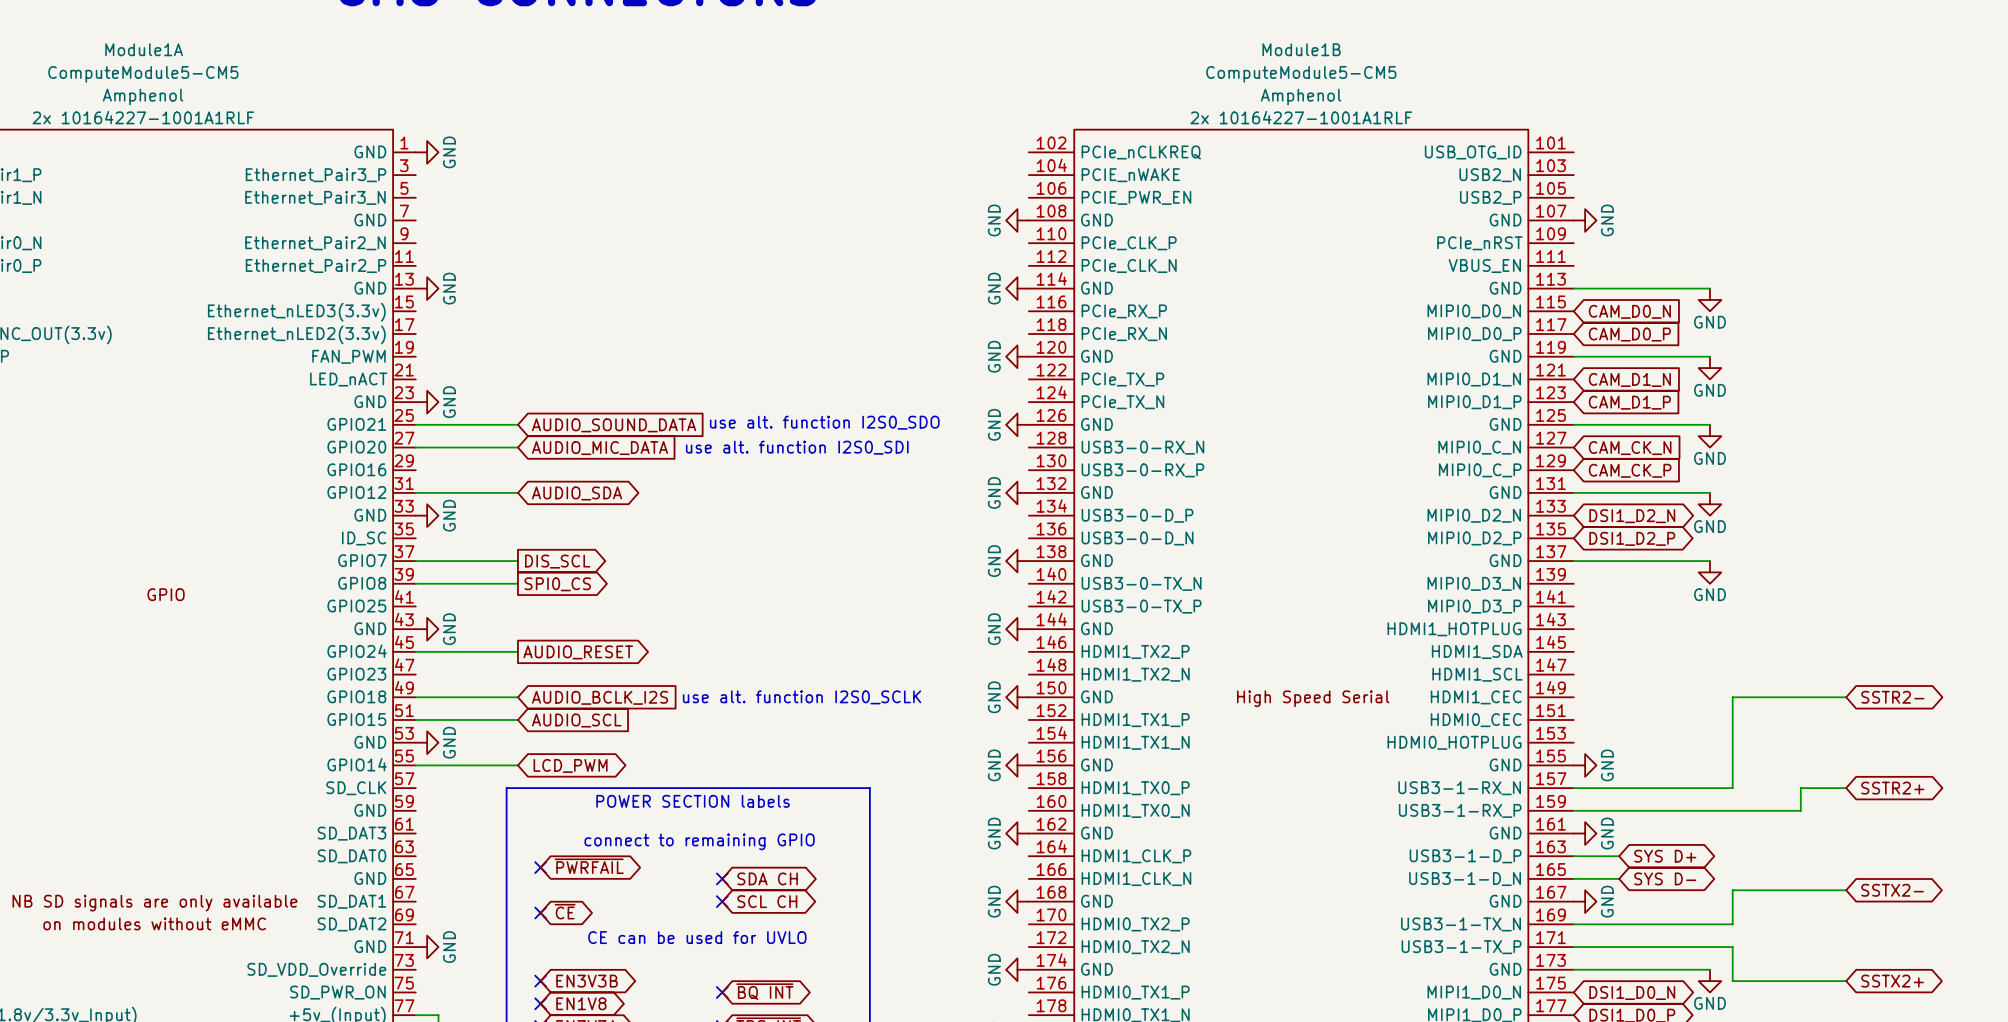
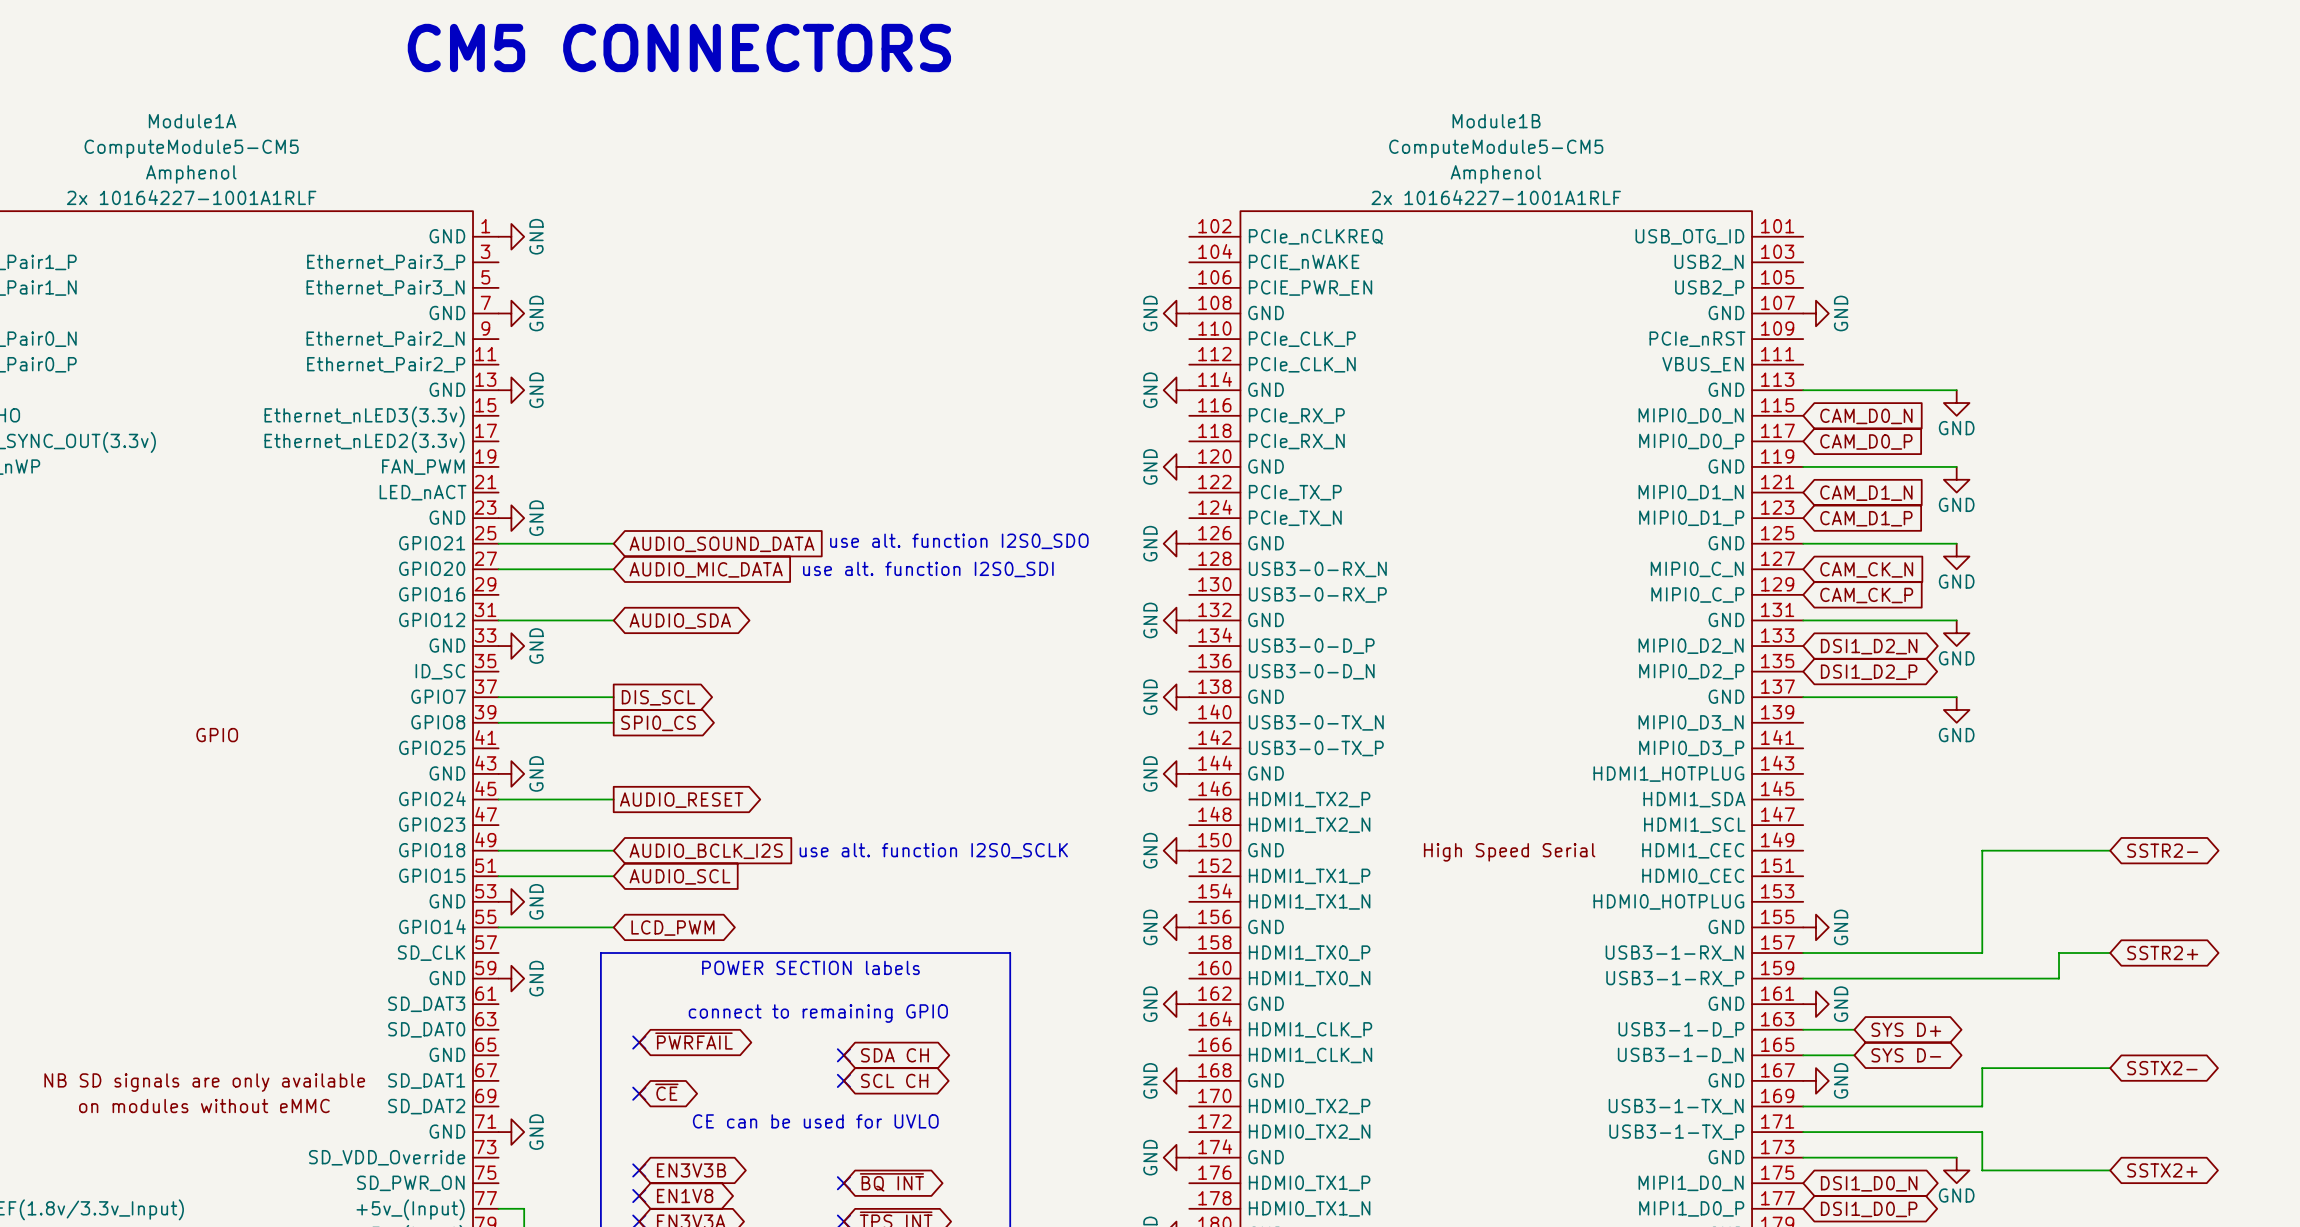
power symbol: none -> GND (511, 313)
power symbol: none -> GND (511, 978)

